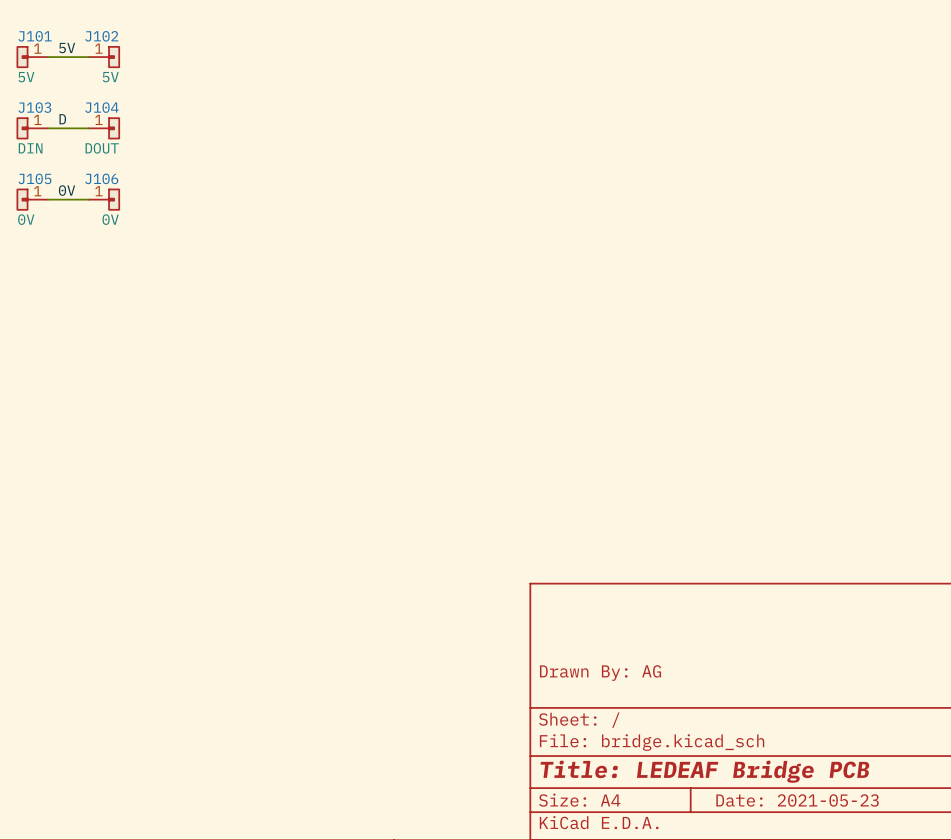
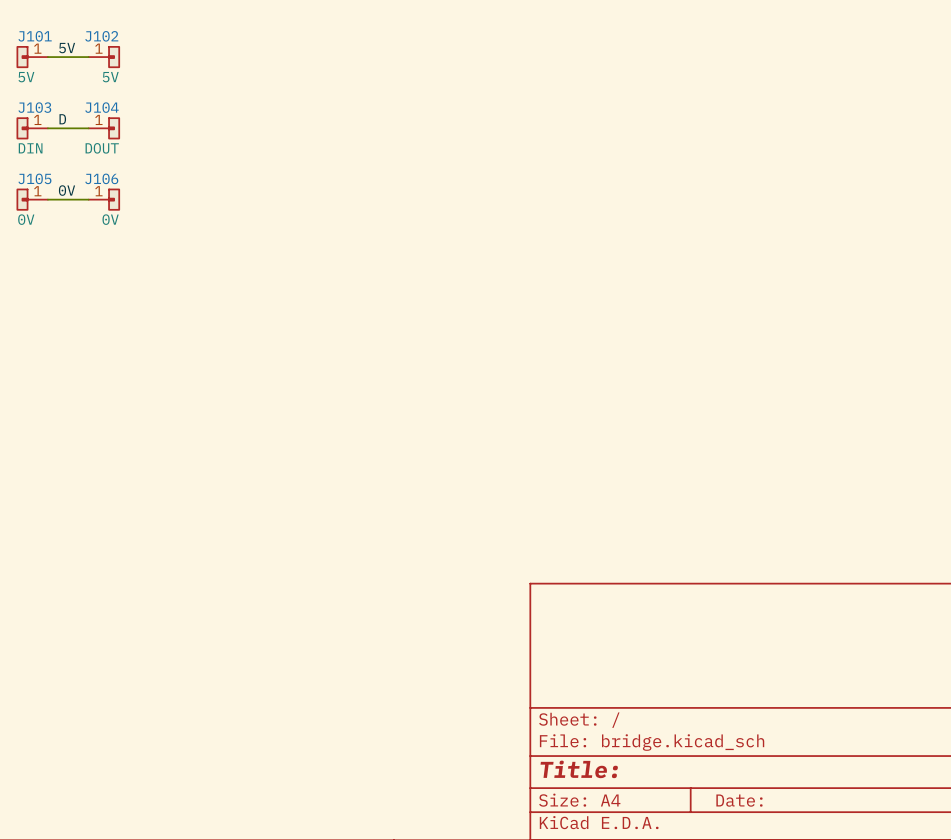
title block: Drawn By: AG (600, 673) -> none
title block: Title: LEDEAF Bridge PCB (704, 771) -> Title: (579, 769)
title block: Date: 2021-05-23 (797, 800) -> Date: (739, 800)

